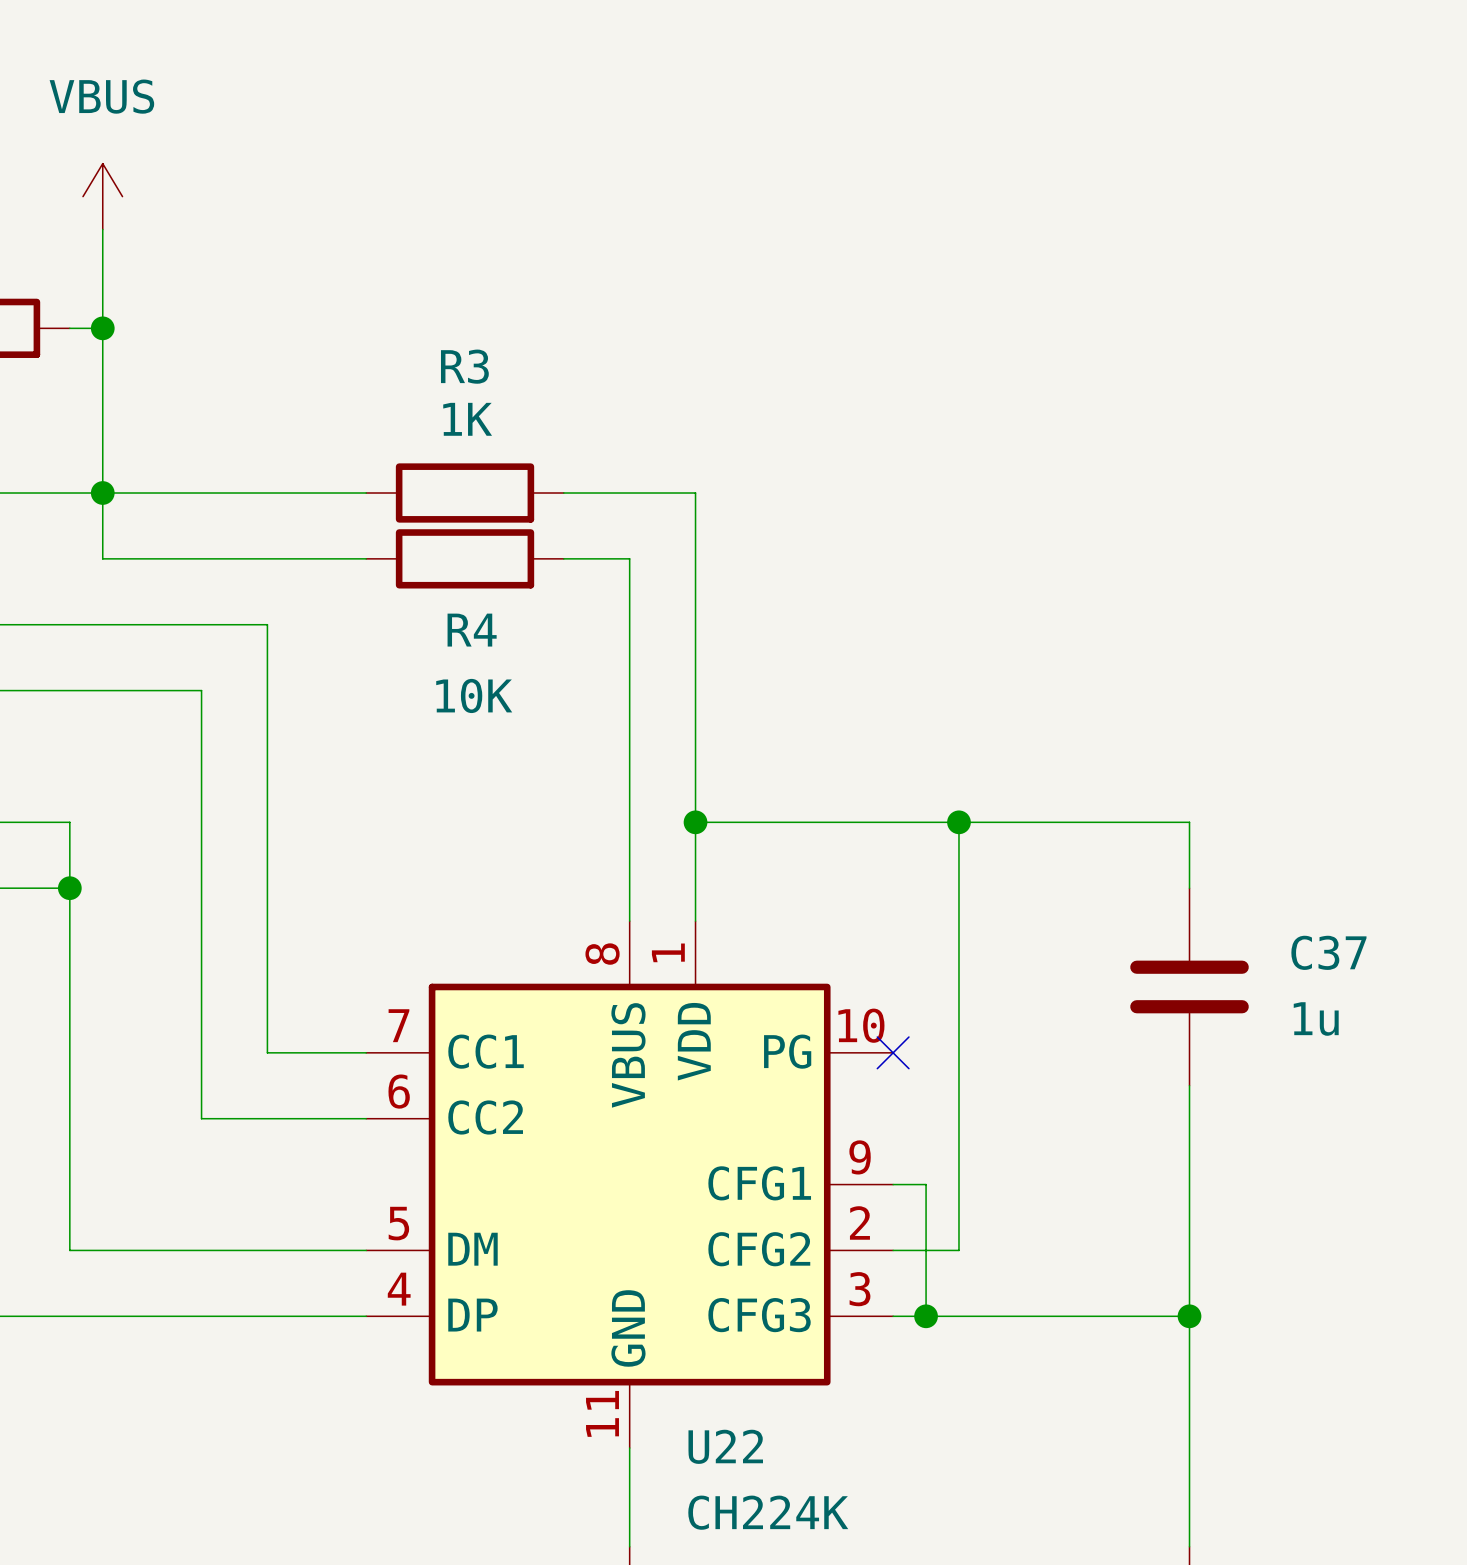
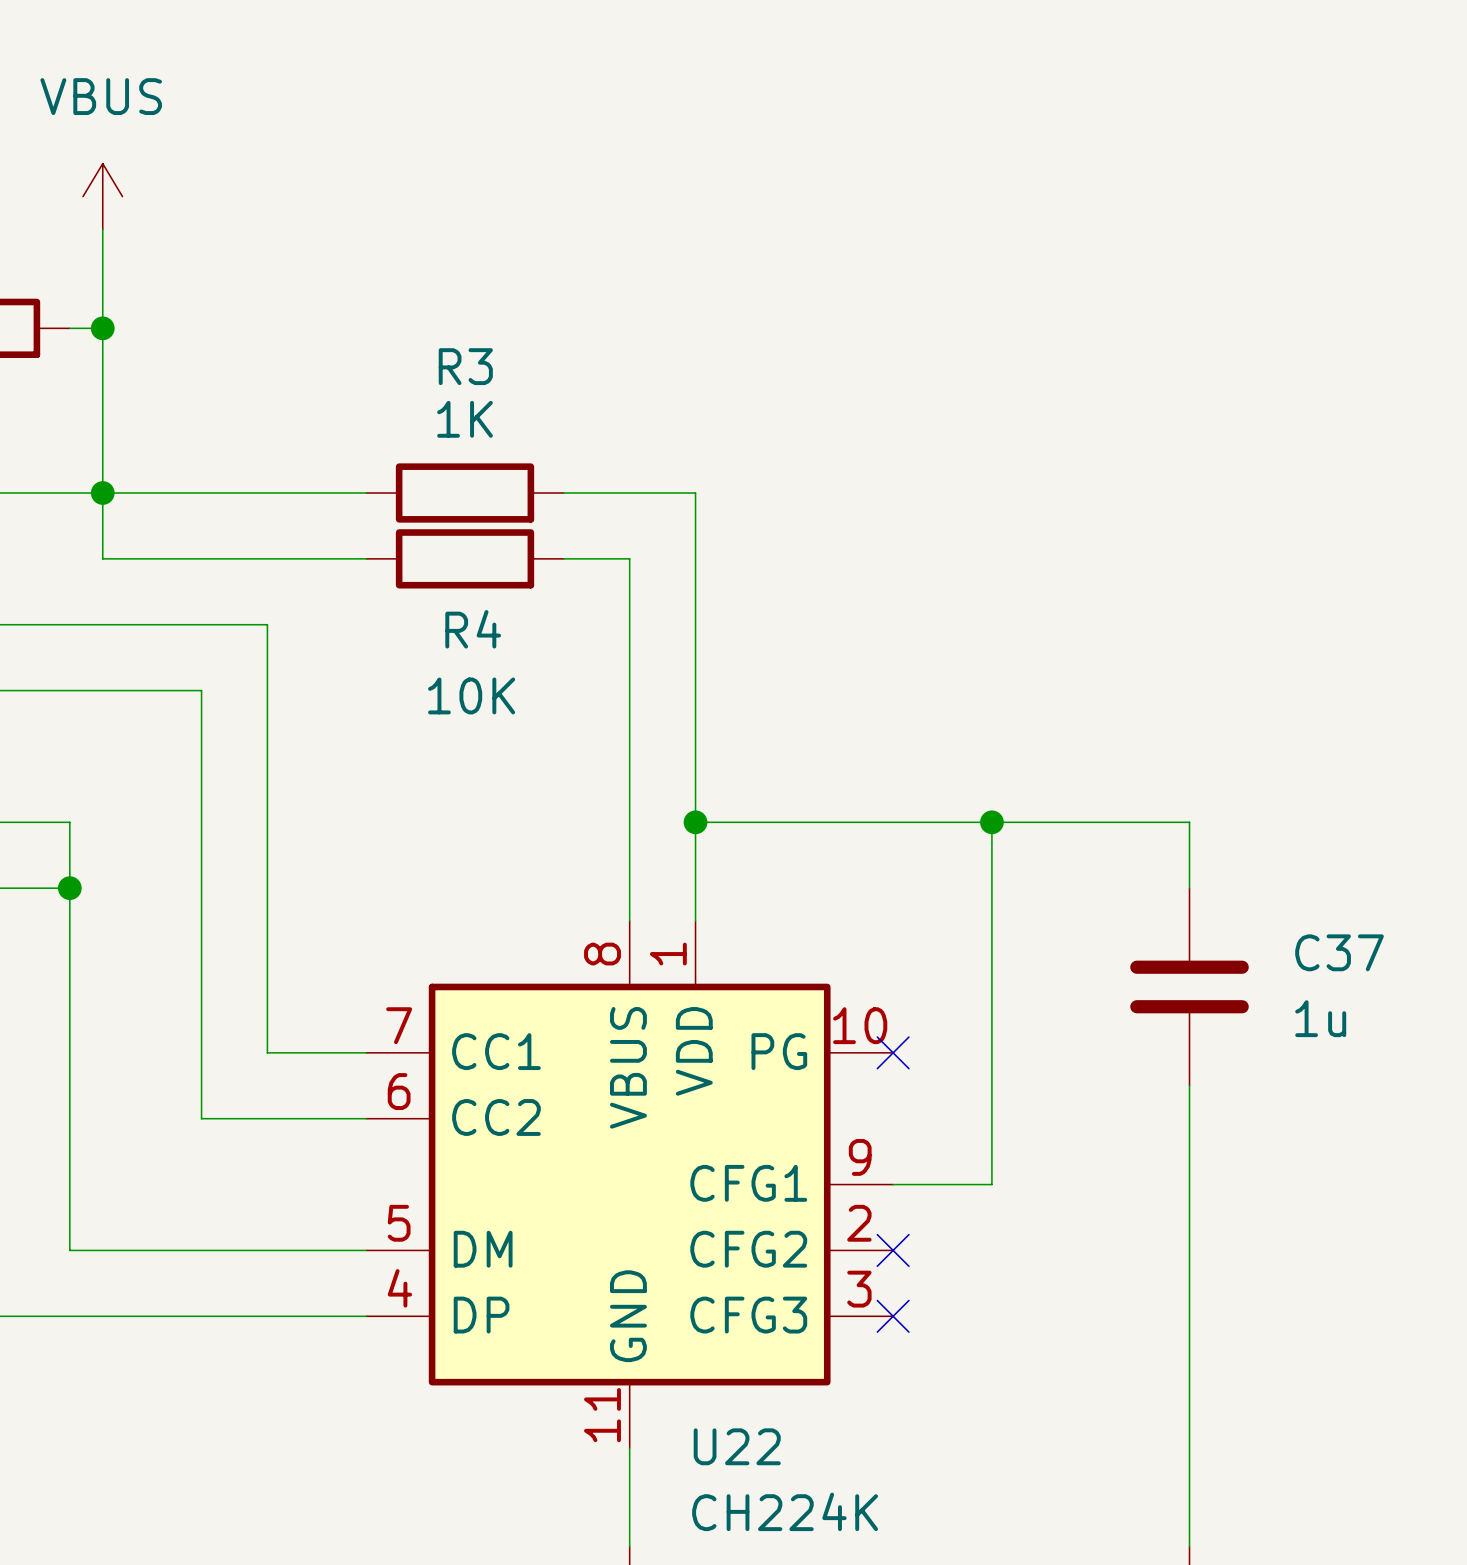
wire: (958, 822) (958, 1250) (893, 1250) -> none
junction position: (958, 822) -> (991, 822)
wire: (926, 1184) (926, 1316) -> (926, 1184) (991, 1184) (991, 822)
no-connect mark: none -> (893, 1250)
wire: (893, 1316) (1189, 1316) -> none
no-connect mark: none -> (893, 1316)
junction: (926, 1316) -> none
junction: (1189, 1316) -> none

